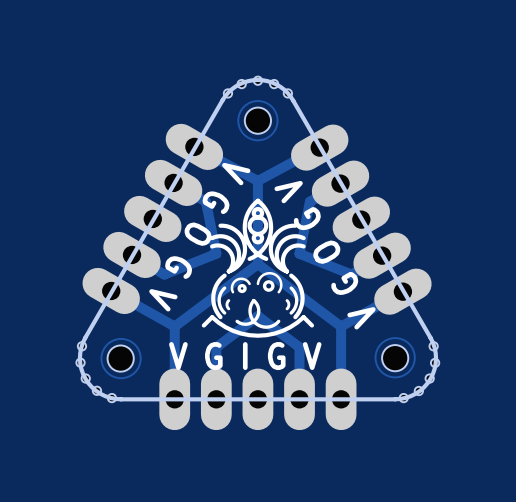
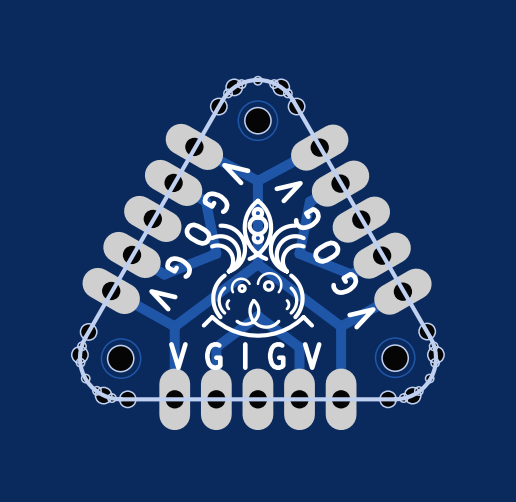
hole: none -> (234, 87)
hole: none -> (281, 87)
hole: none -> (218, 106)
hole: none -> (296, 106)
hole: none -> (88, 331)
hole: none -> (427, 331)
hole: none -> (79, 354)
hole: none -> (435, 354)
hole: none -> (103, 395)
hole: none -> (412, 395)
hole: none -> (127, 399)
hole: none -> (388, 399)

